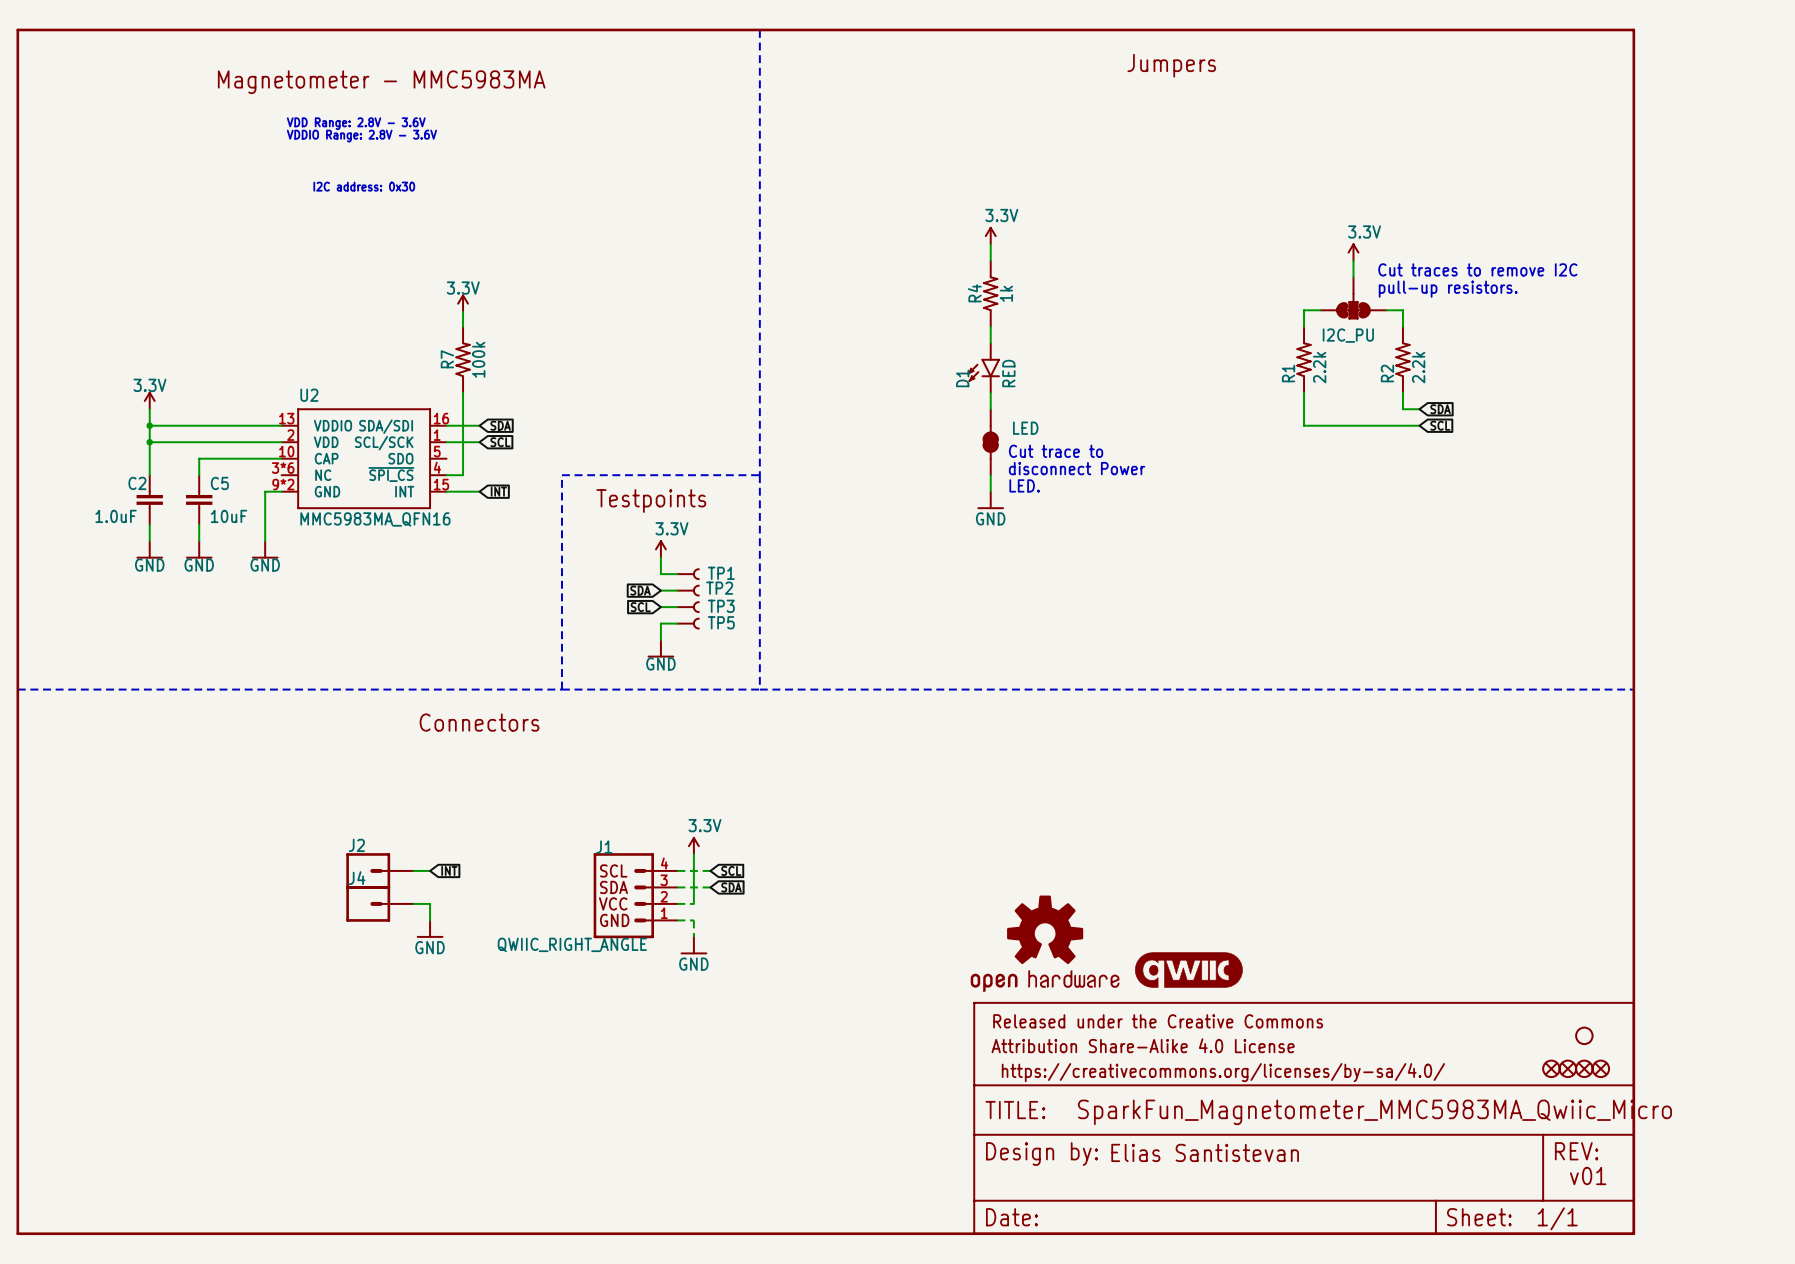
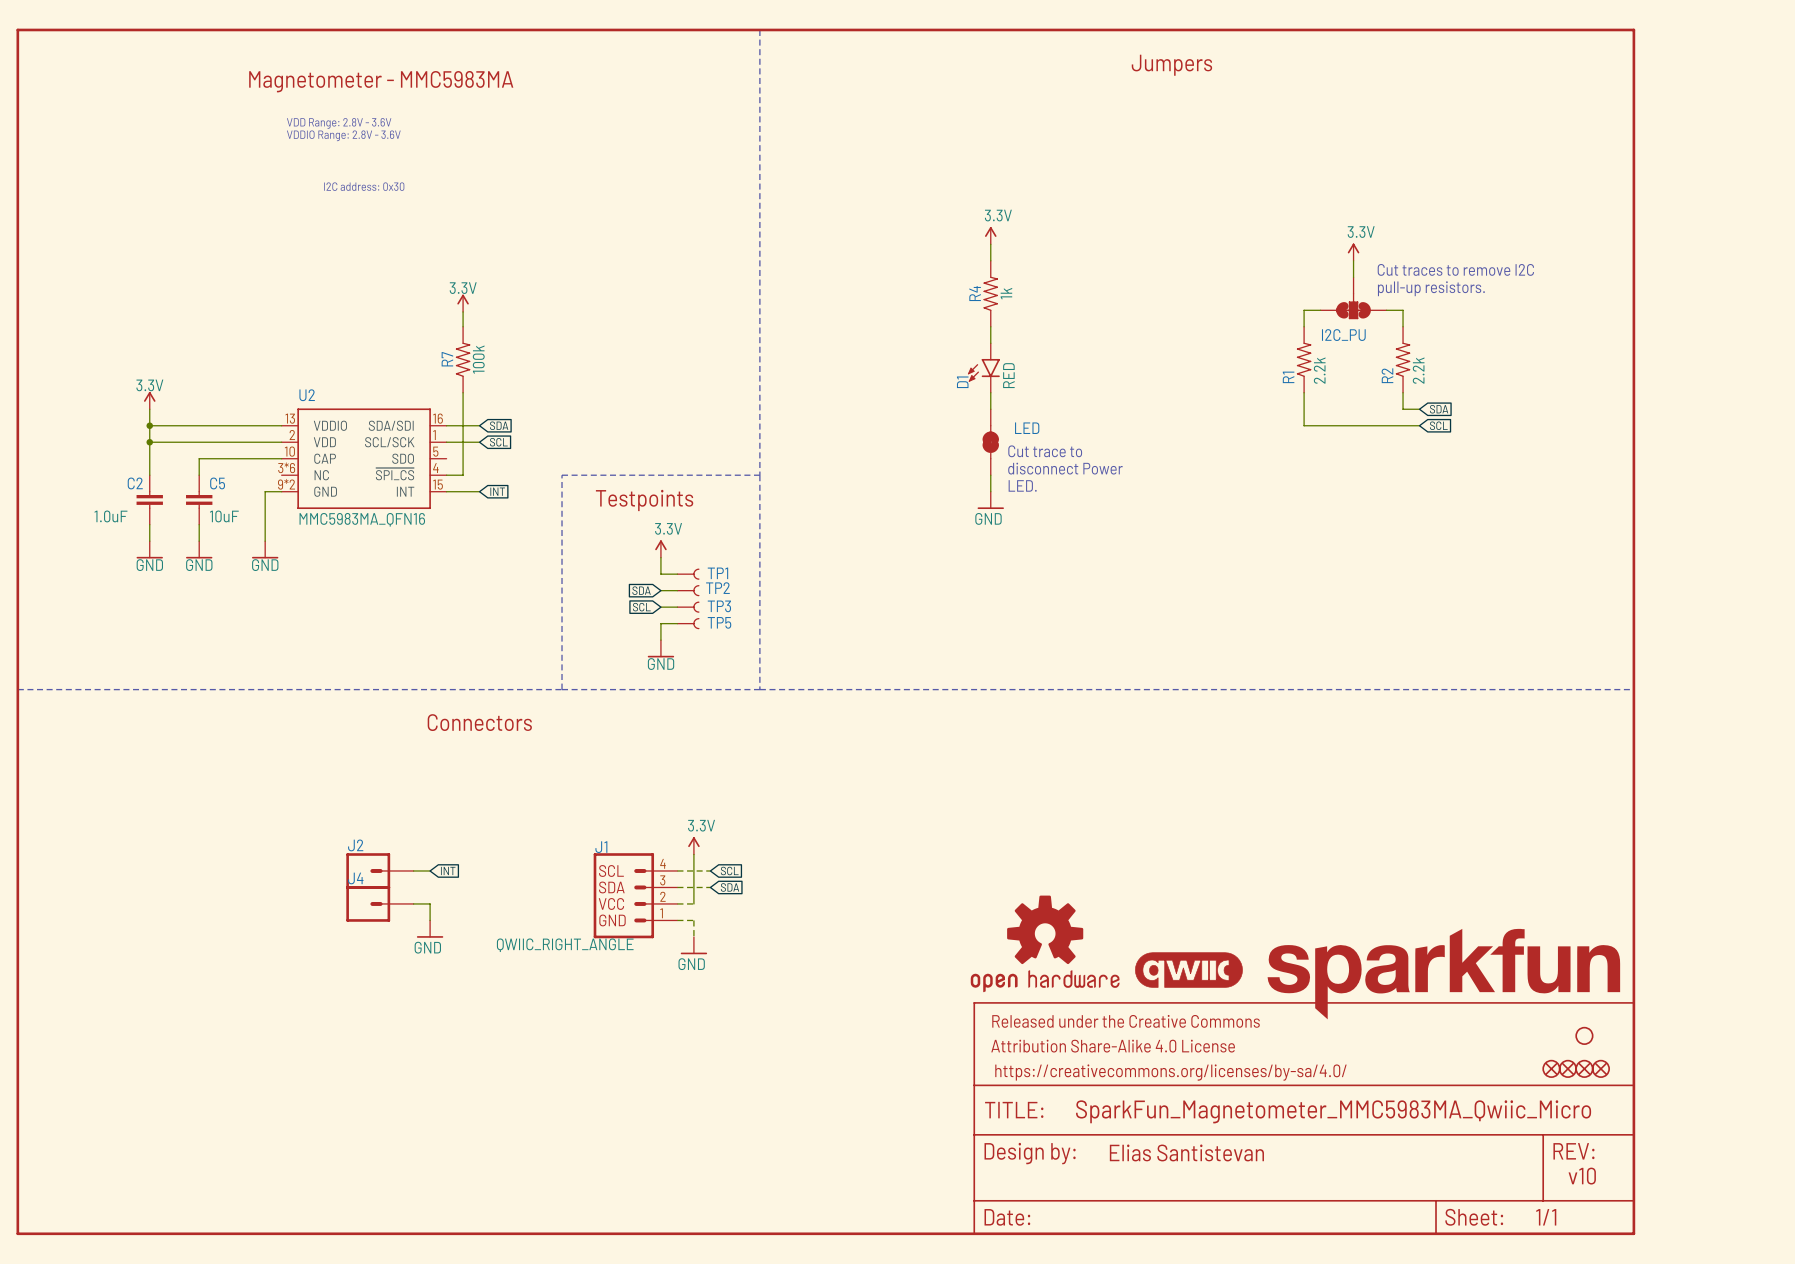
part: none -> (1443, 974)
text: v01 (1588, 1176) -> v10 (1582, 1176)

